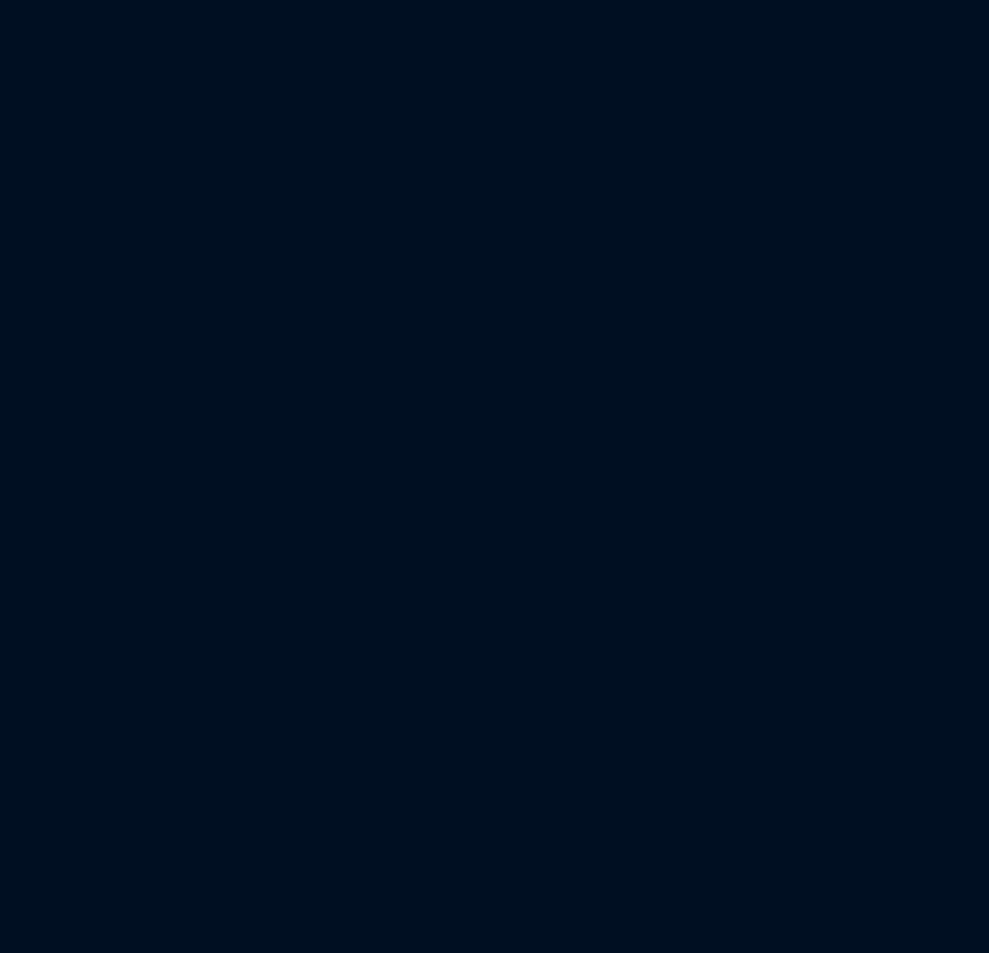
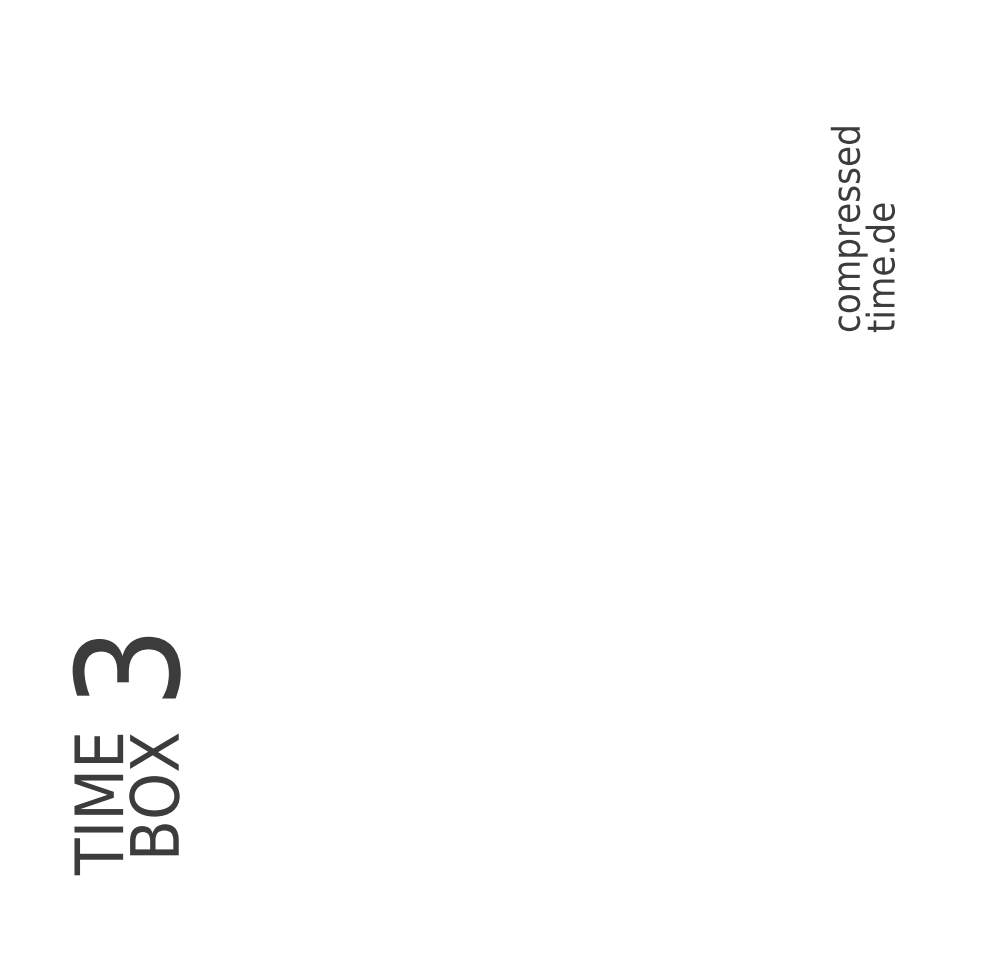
text: none -> compressed (849, 229)
text: none -> time.de (880, 267)
text: none -> 3 (126, 667)
text: none -> TIME (98, 805)
text: none -> BOX (154, 794)

